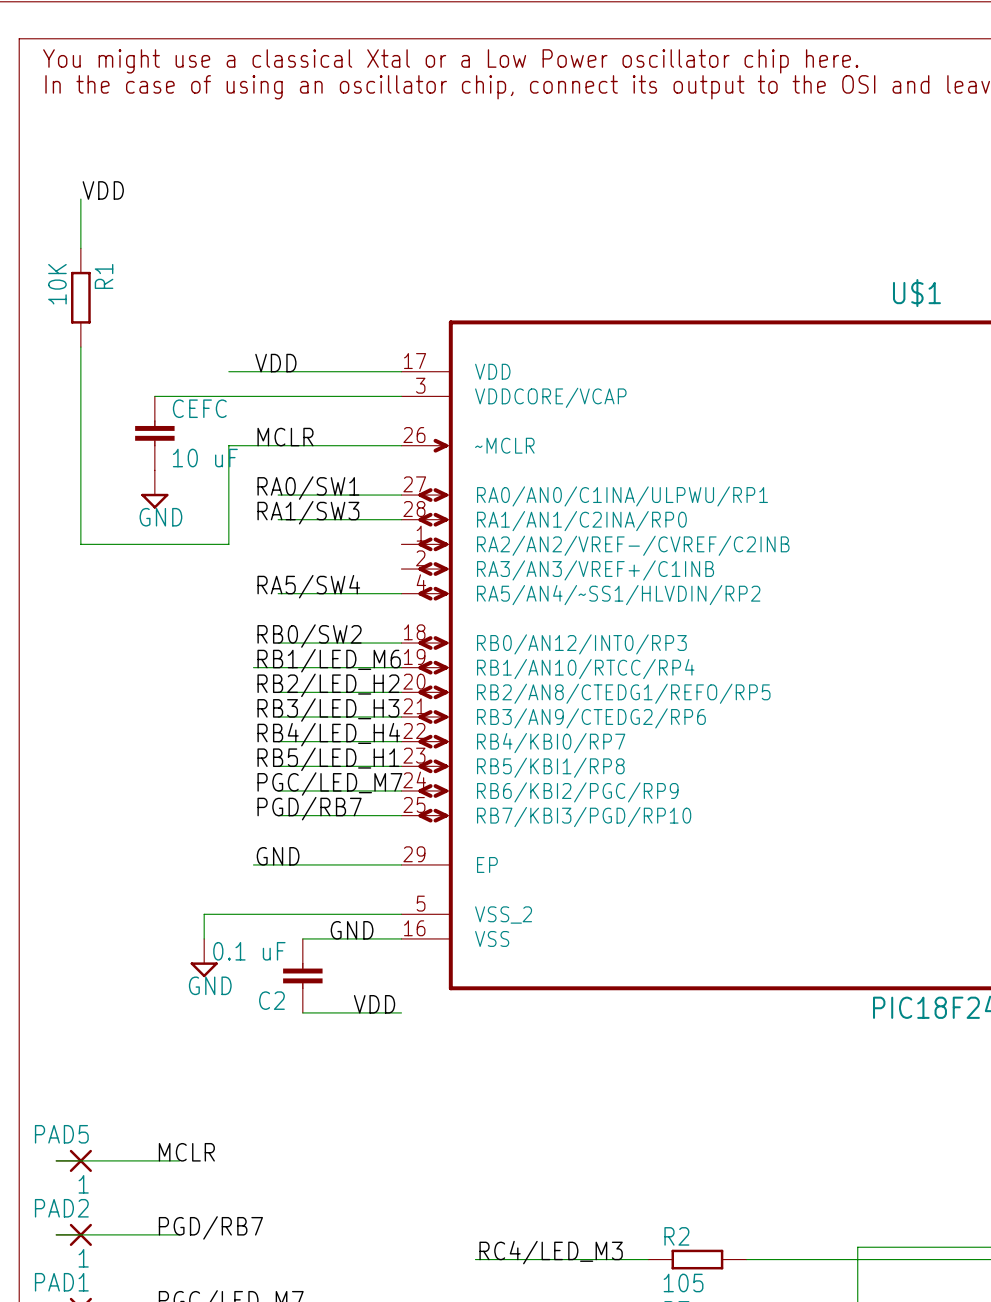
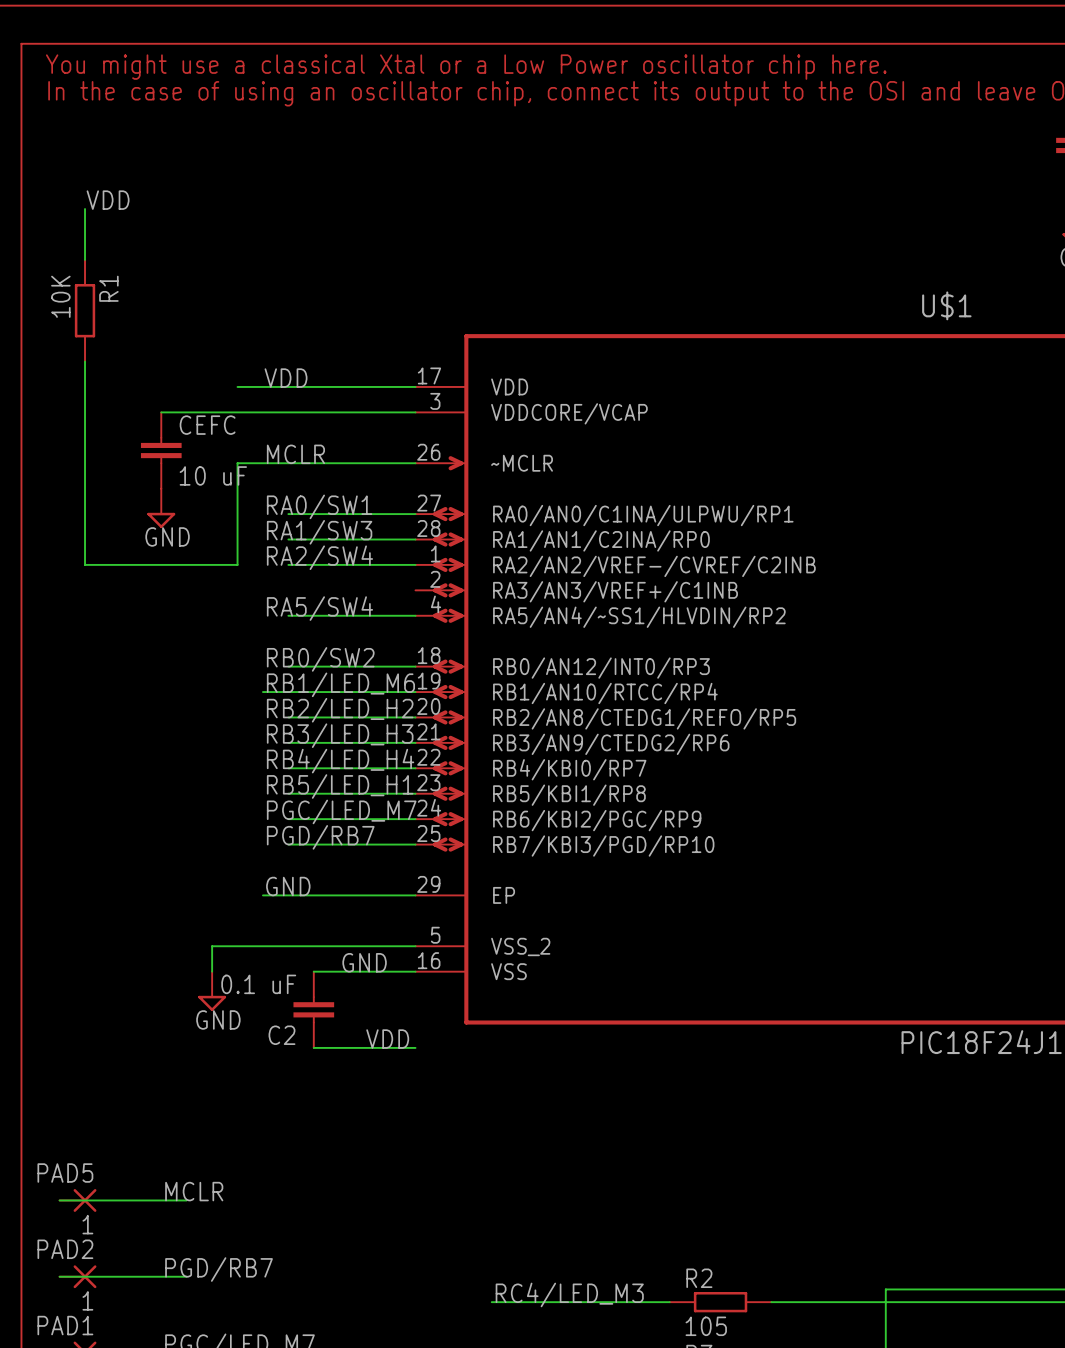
label: none -> RA2/SW4 (319, 557)
wire: none -> (288, 564) (415, 564)

